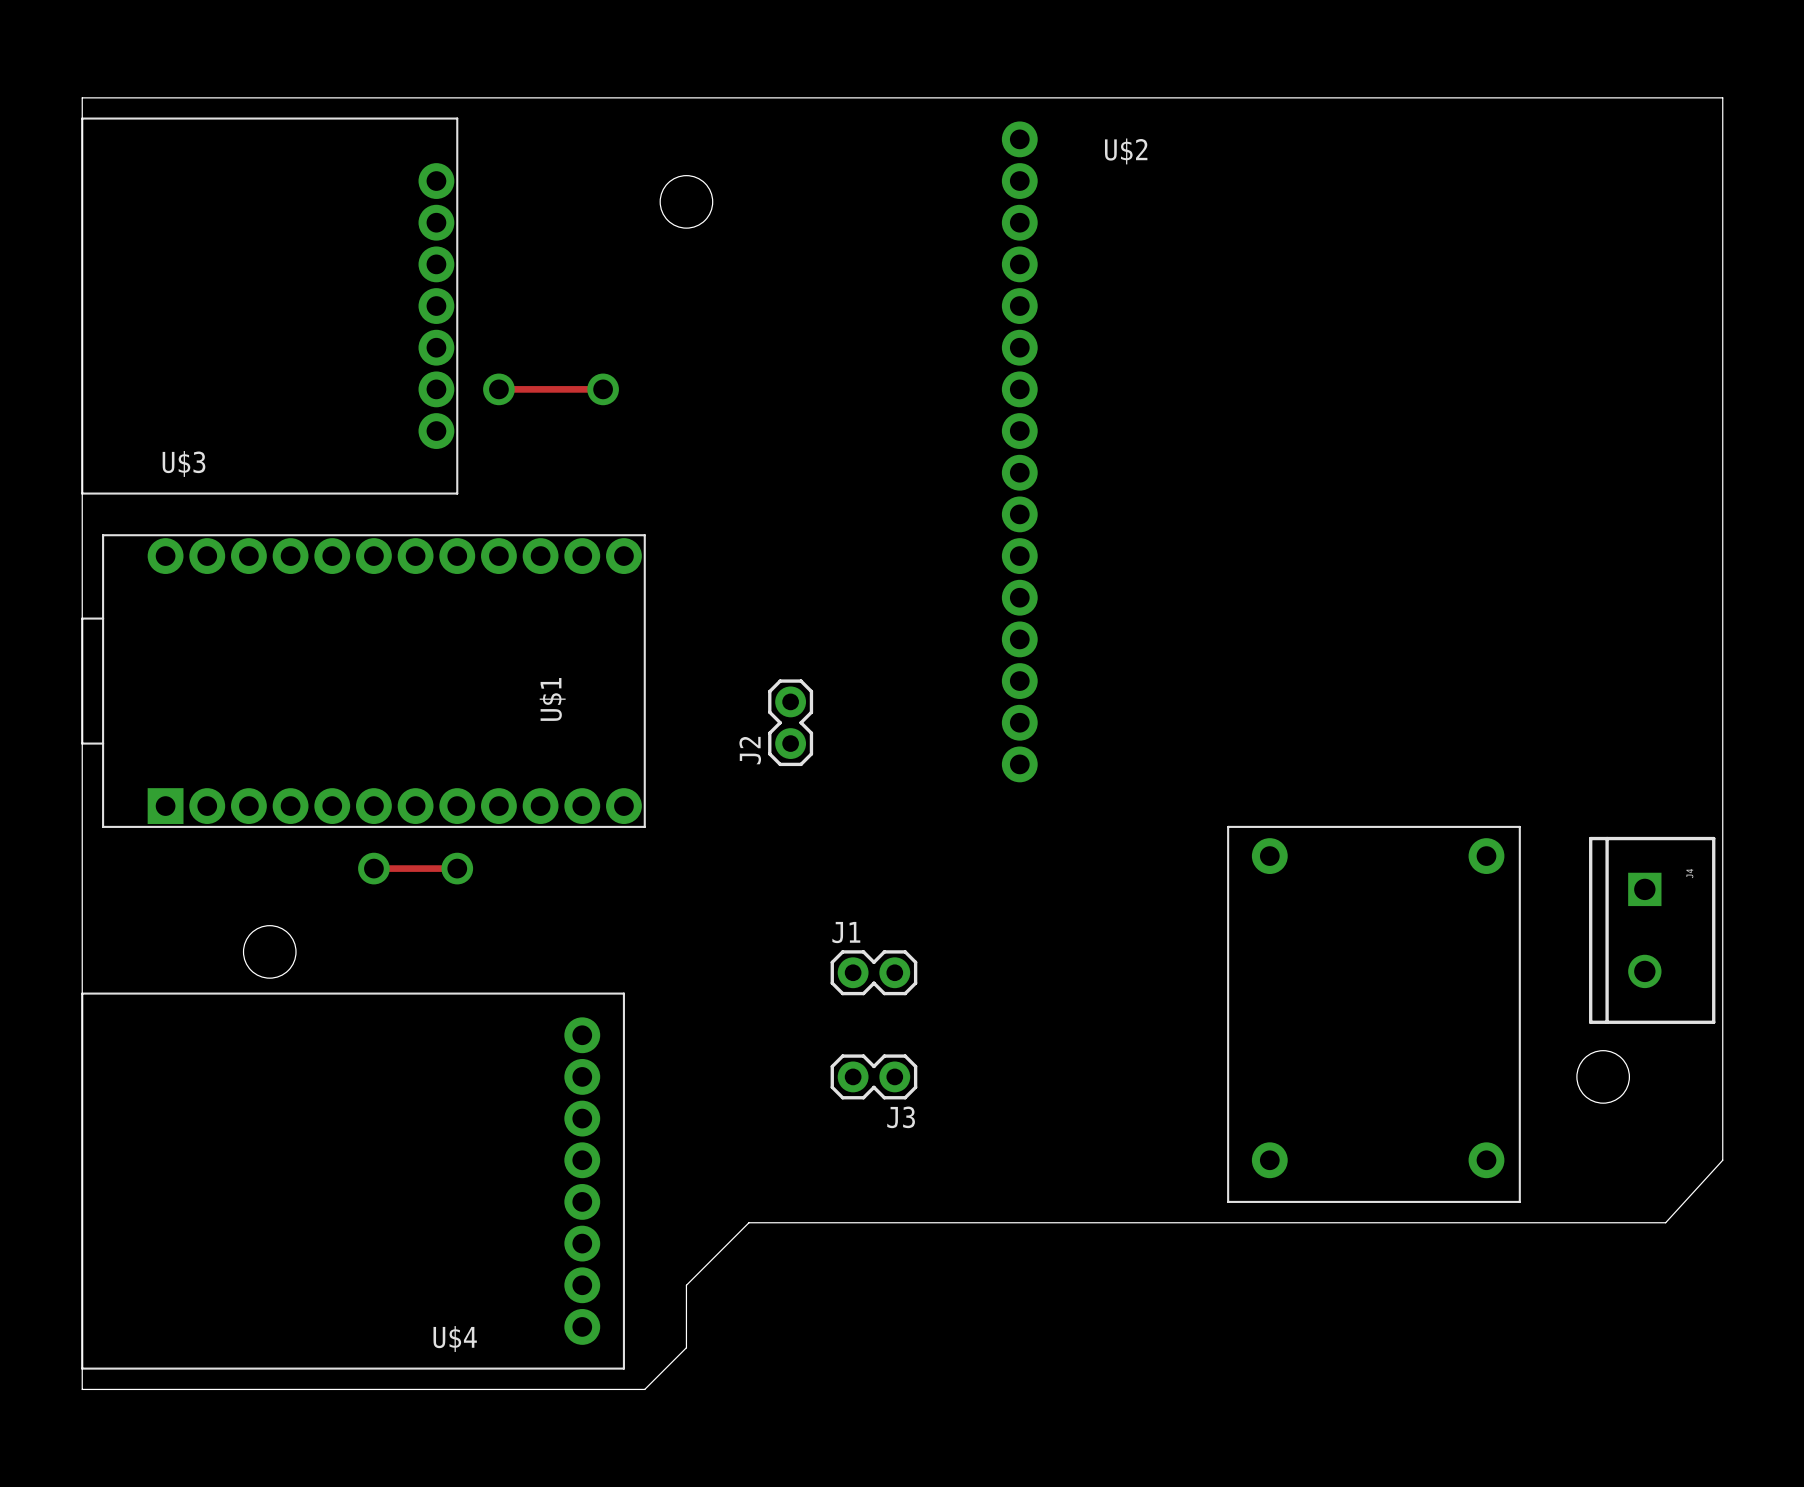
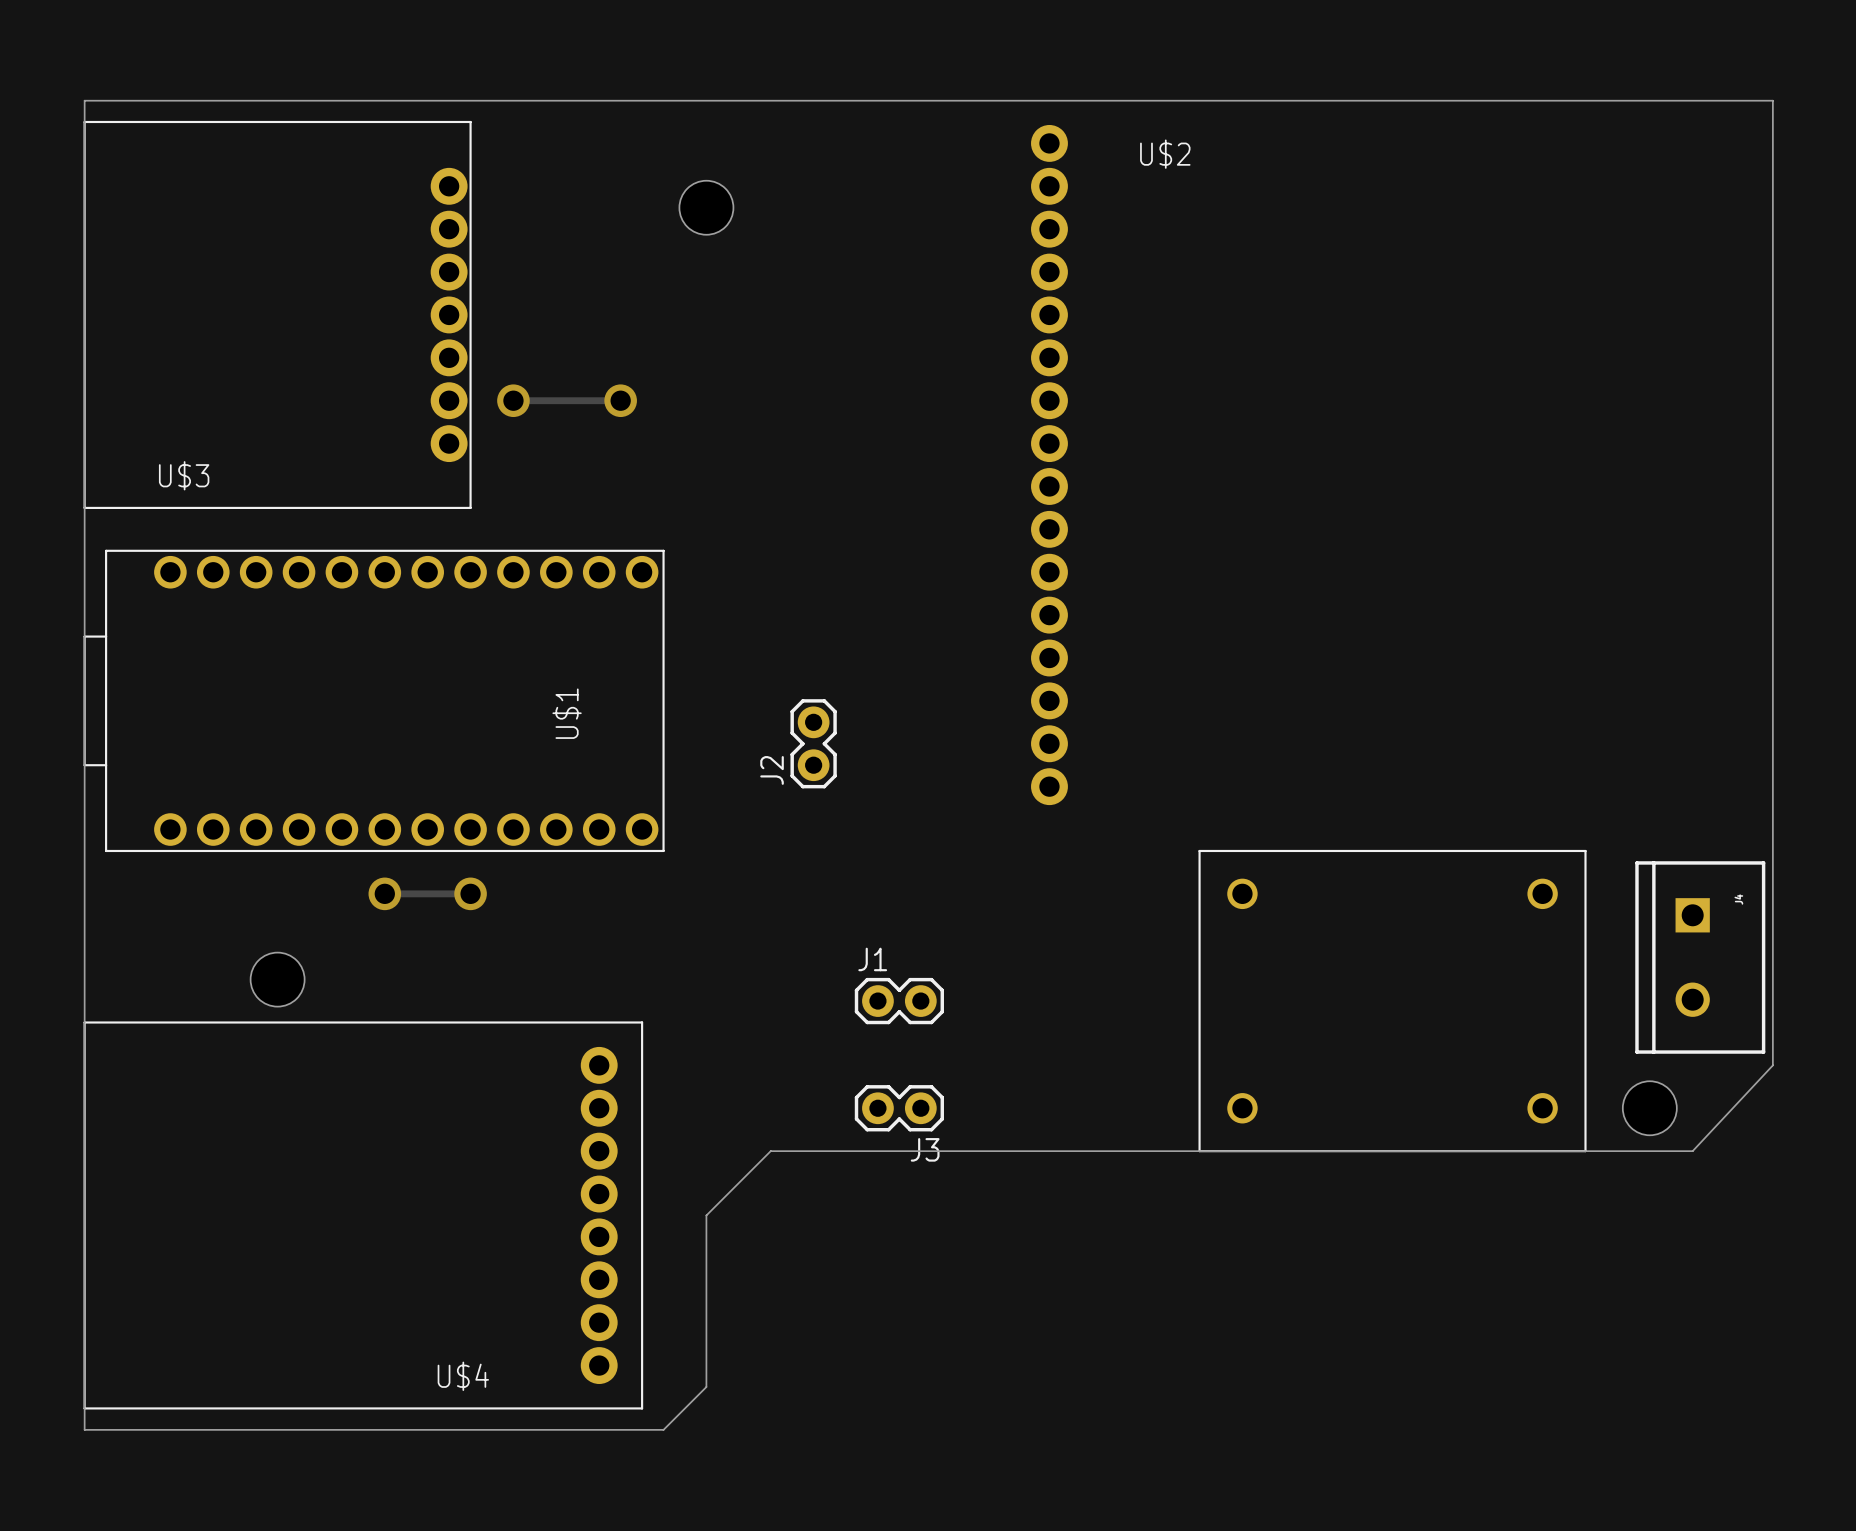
U$1 footprint: [81, 534, 646, 828] -> [83, 549, 665, 853]
part: none -> (1392, 1001)
part: (1373, 1014) -> none
board edge: (1722, 1035) (1722, 1160) (1665, 1222) (748, 1222) (686, 1285) -> (1772, 1065) (1692, 1151) (770, 1151) (706, 1215) (706, 1322)

